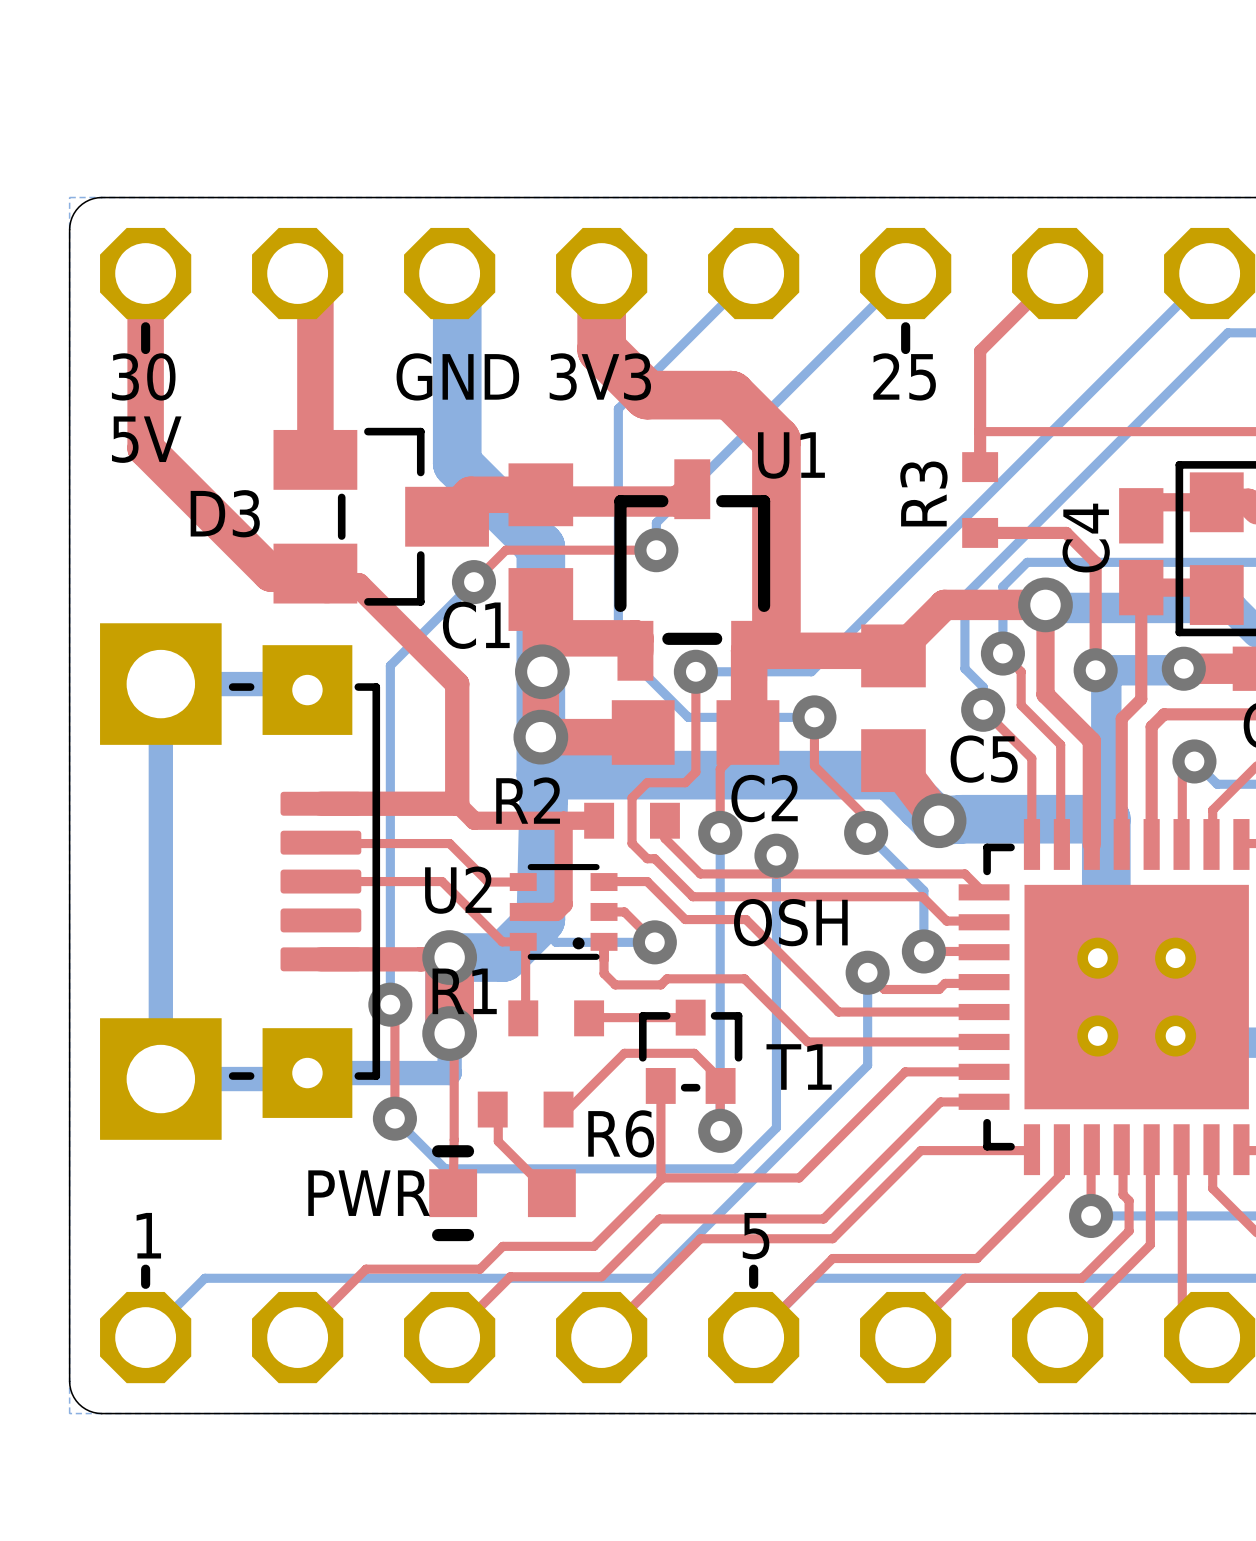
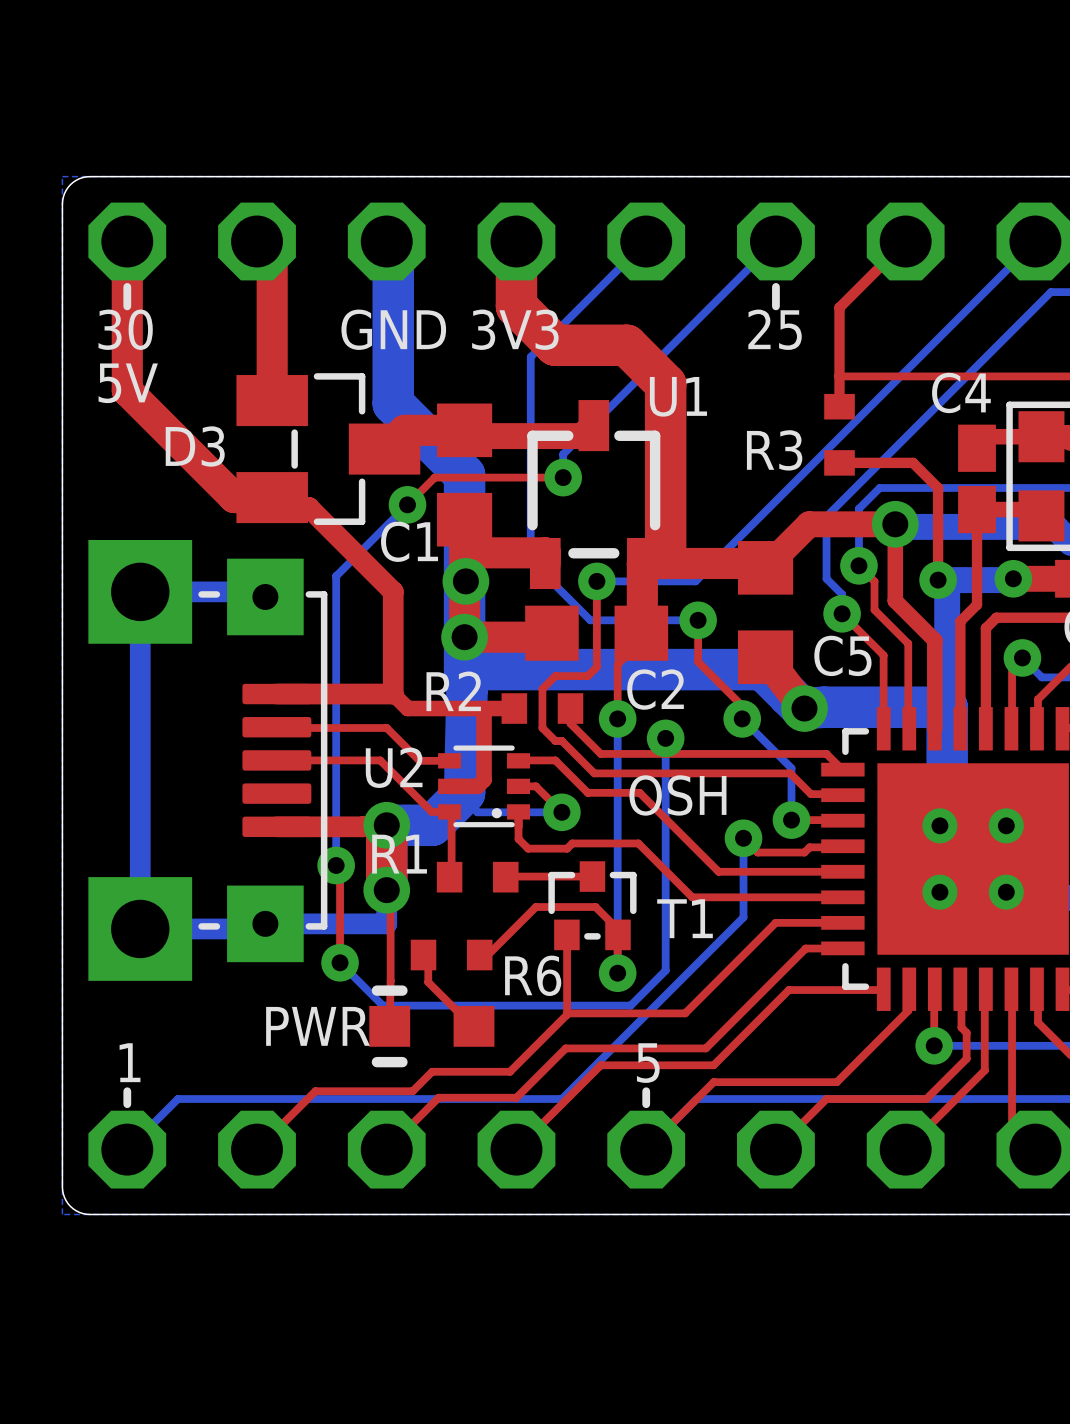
R3 name rotation: 0° (923, 493) -> 90° clockwise (774, 450)
C4 name rotation: 0° (1086, 538) -> 90° clockwise (961, 392)

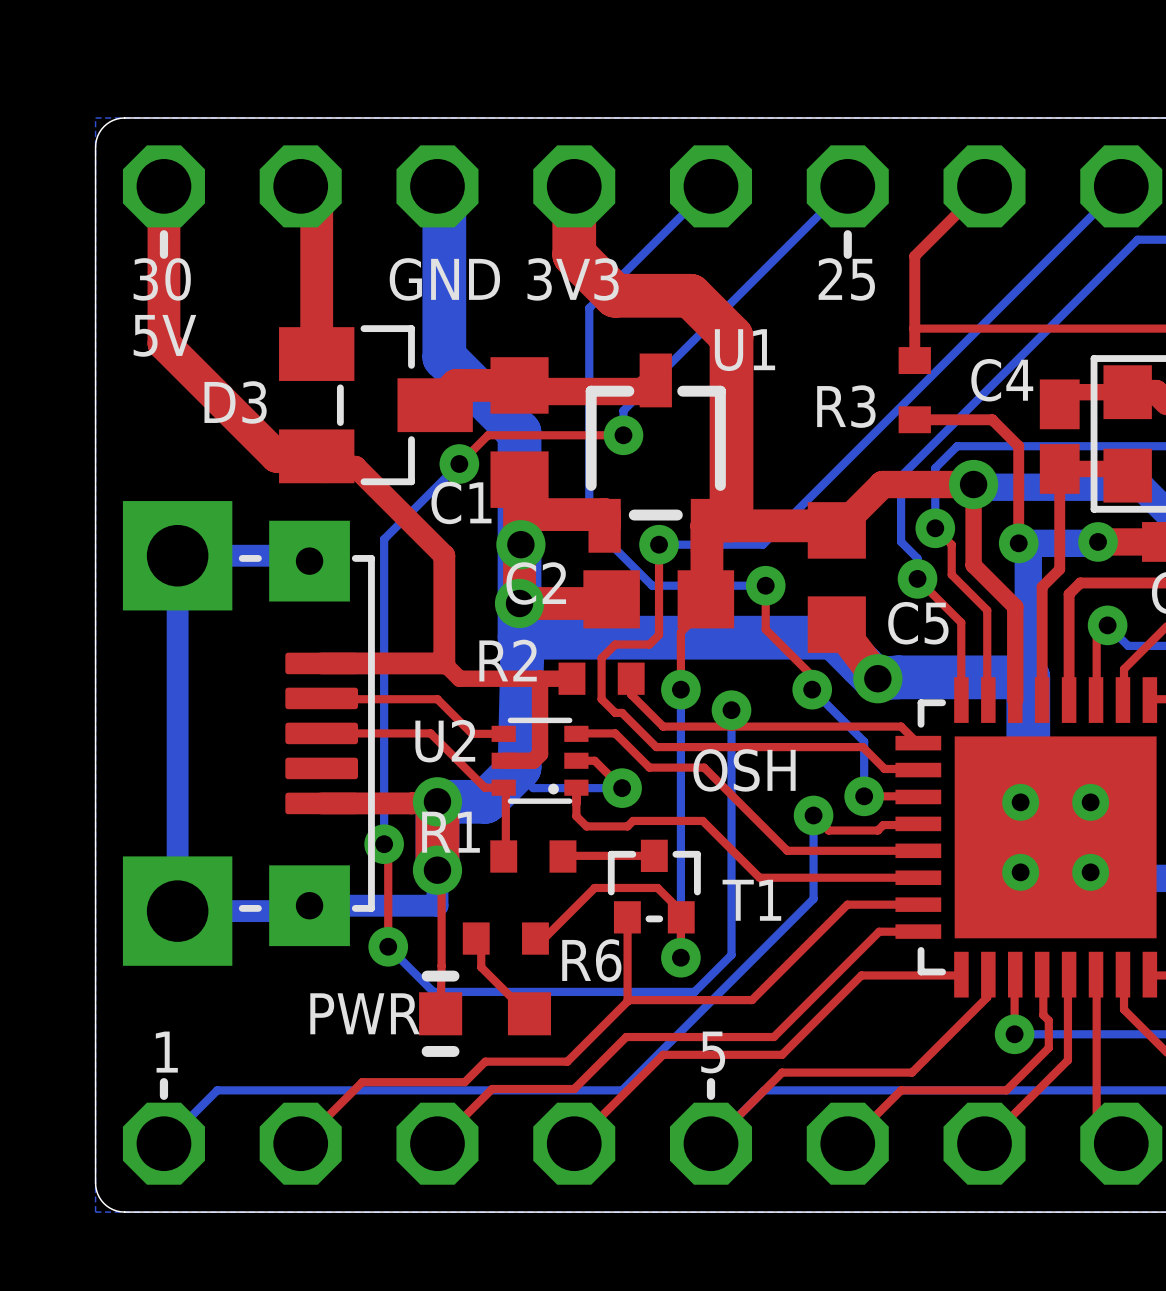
C4 name position: C4 (961, 392) -> C4 (1002, 380)
C2 name position: C2 (655, 689) -> C2 (536, 583)

